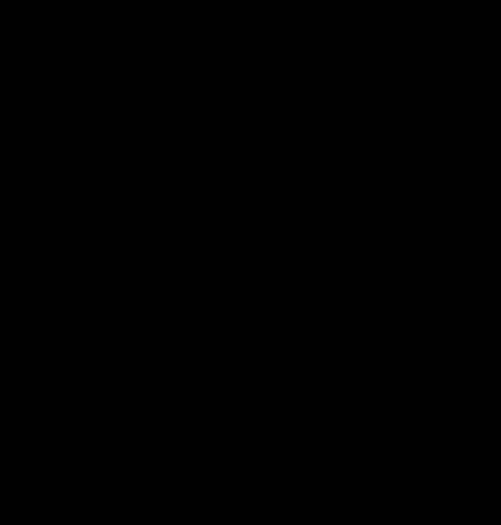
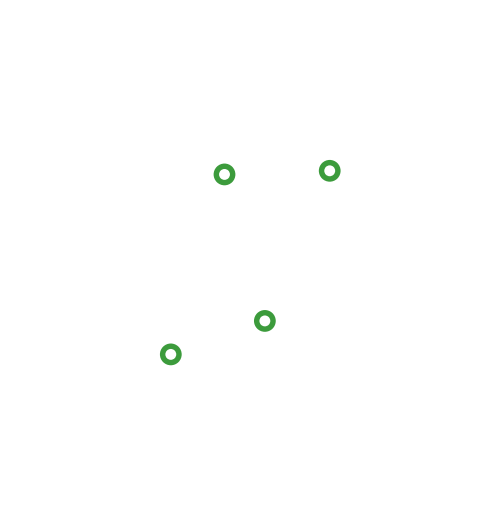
via: none -> (329, 170)
via: none -> (224, 174)
via: none -> (264, 320)
via: none -> (170, 354)

